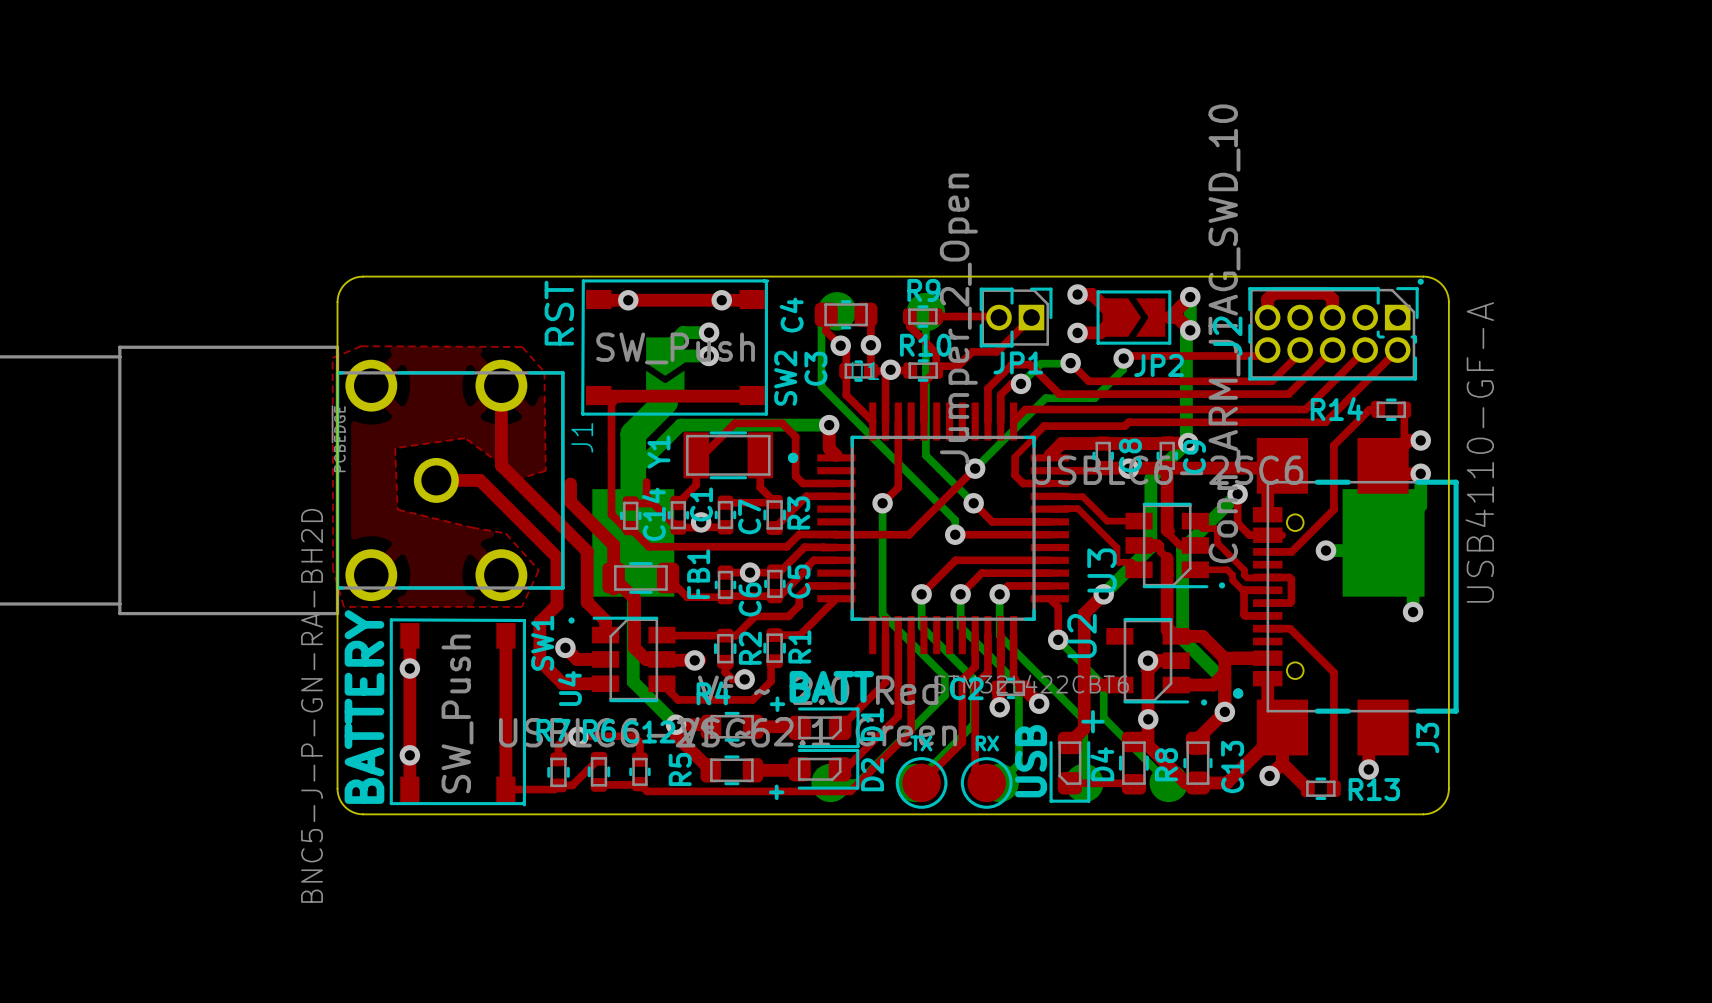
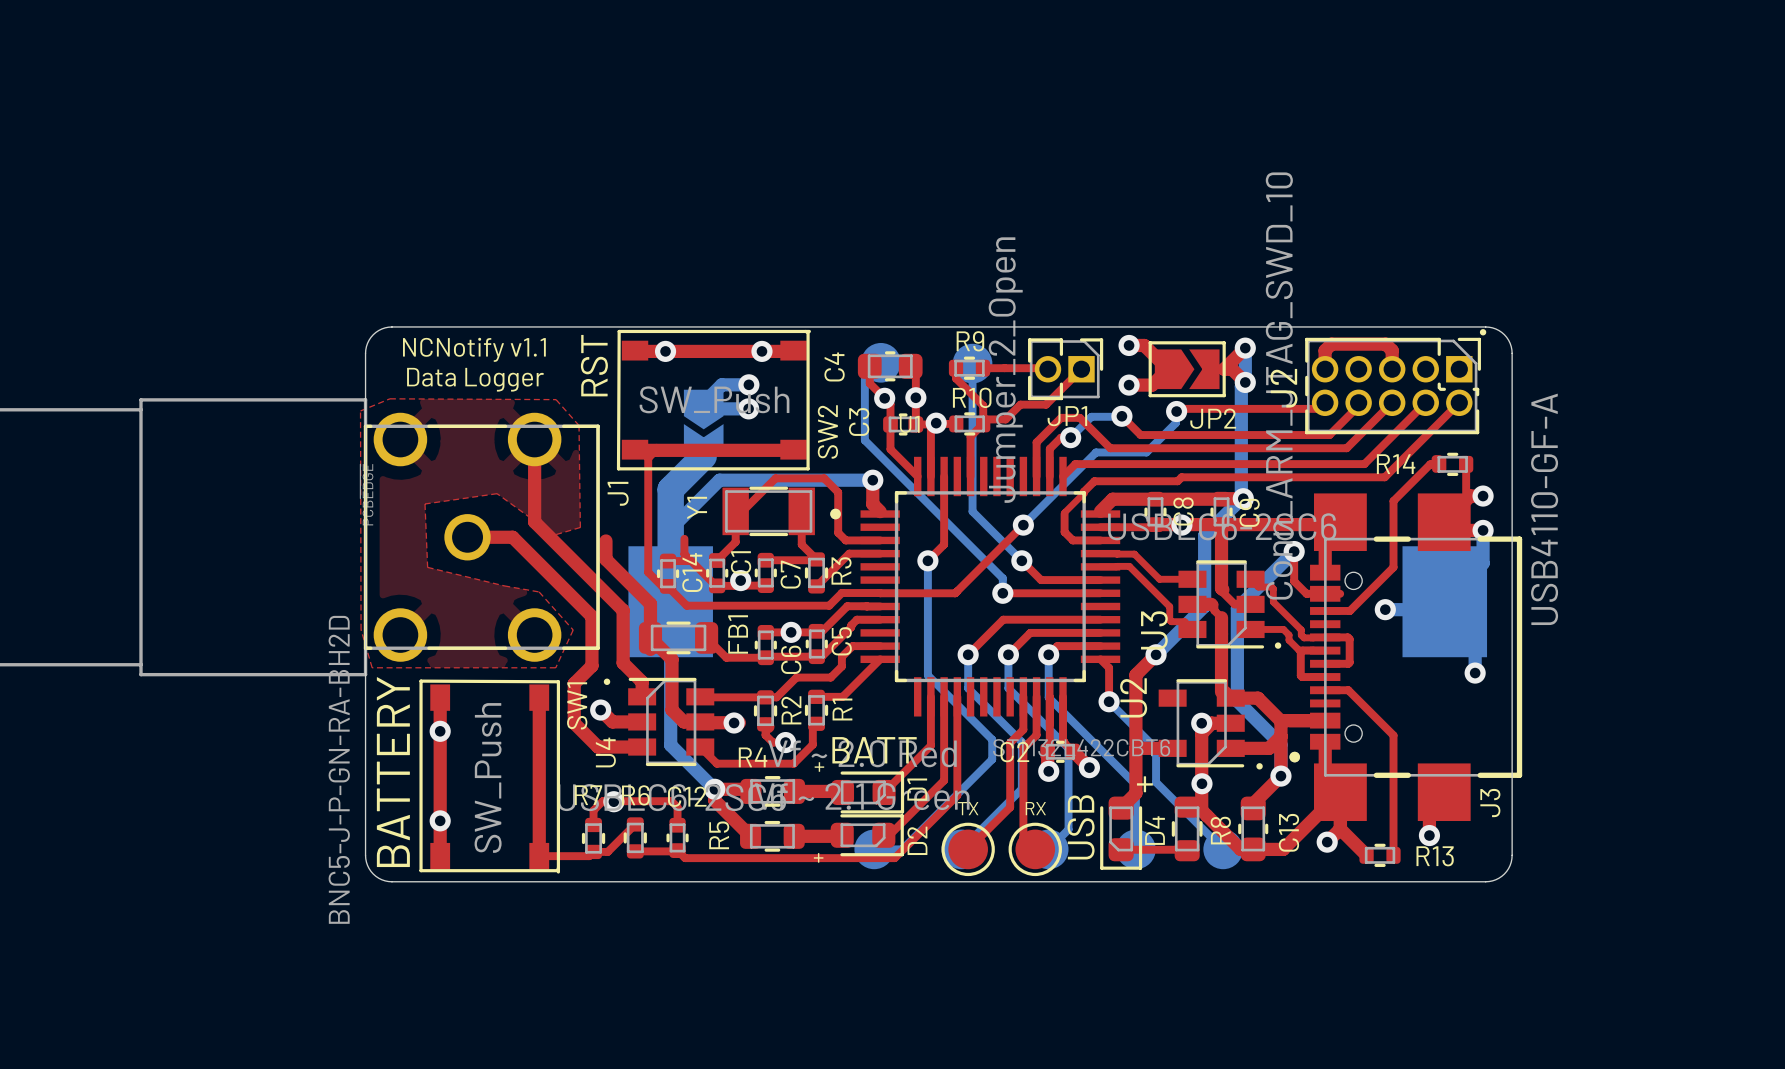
text: none -> NCNotify v1.1 (474, 349)
text: none -> Data Logger (475, 379)

